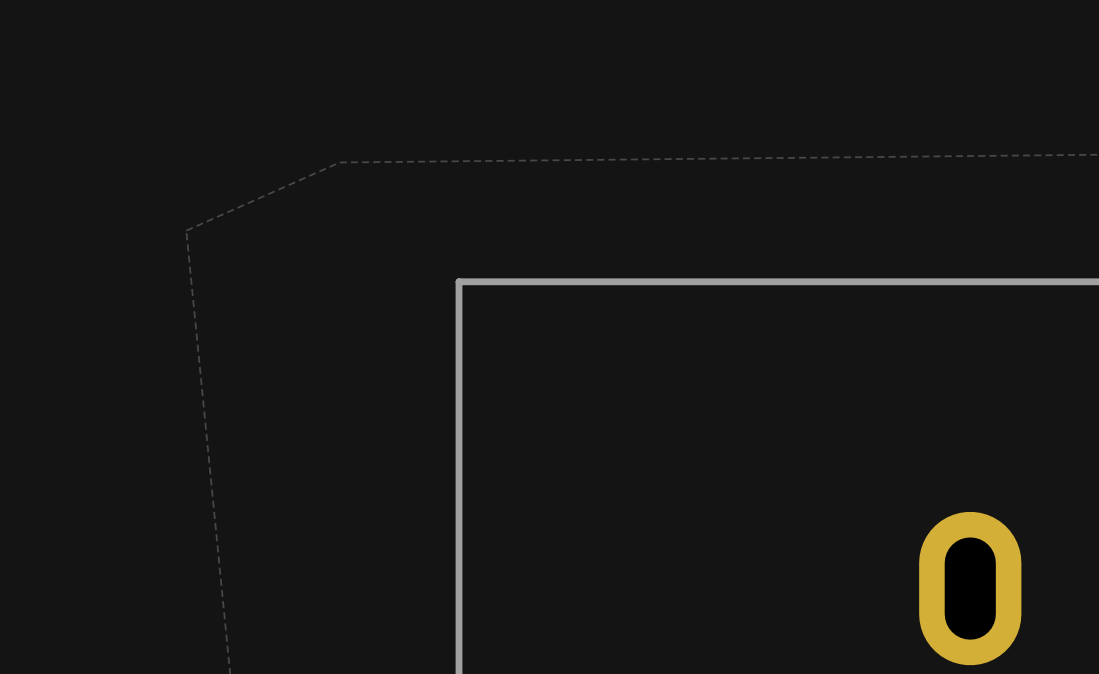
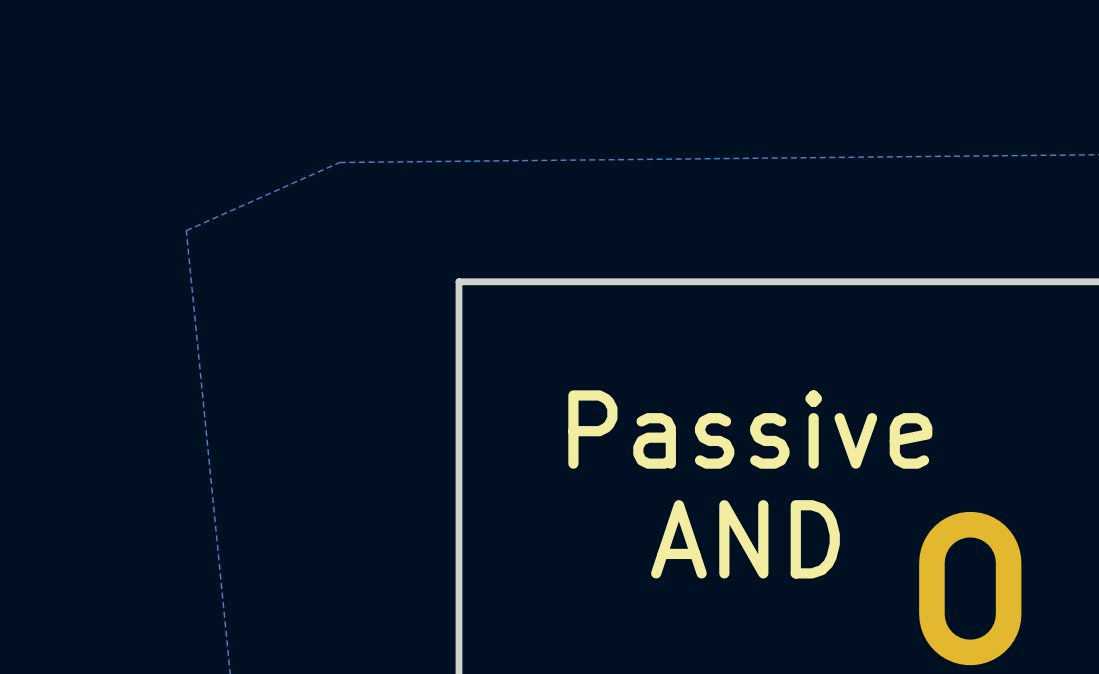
text: none -> Passive (750, 429)
text: none -> AND (745, 539)

